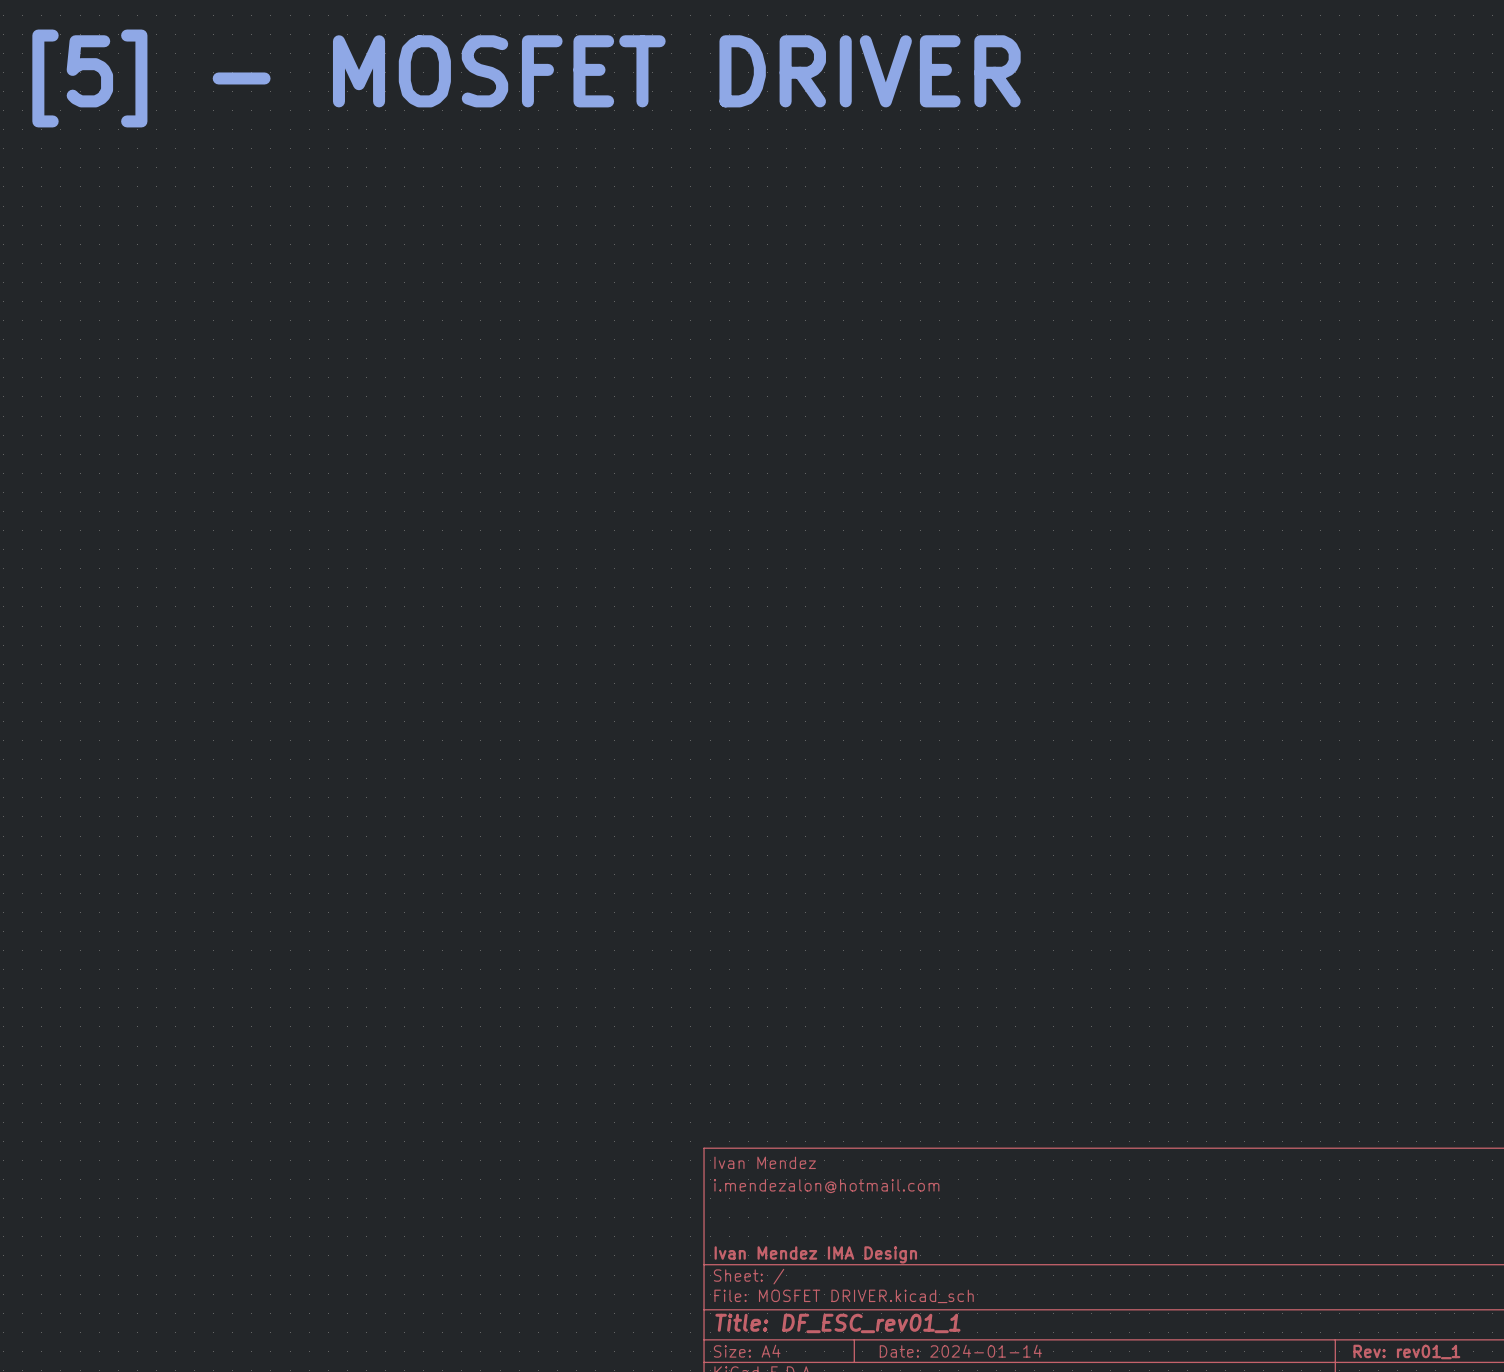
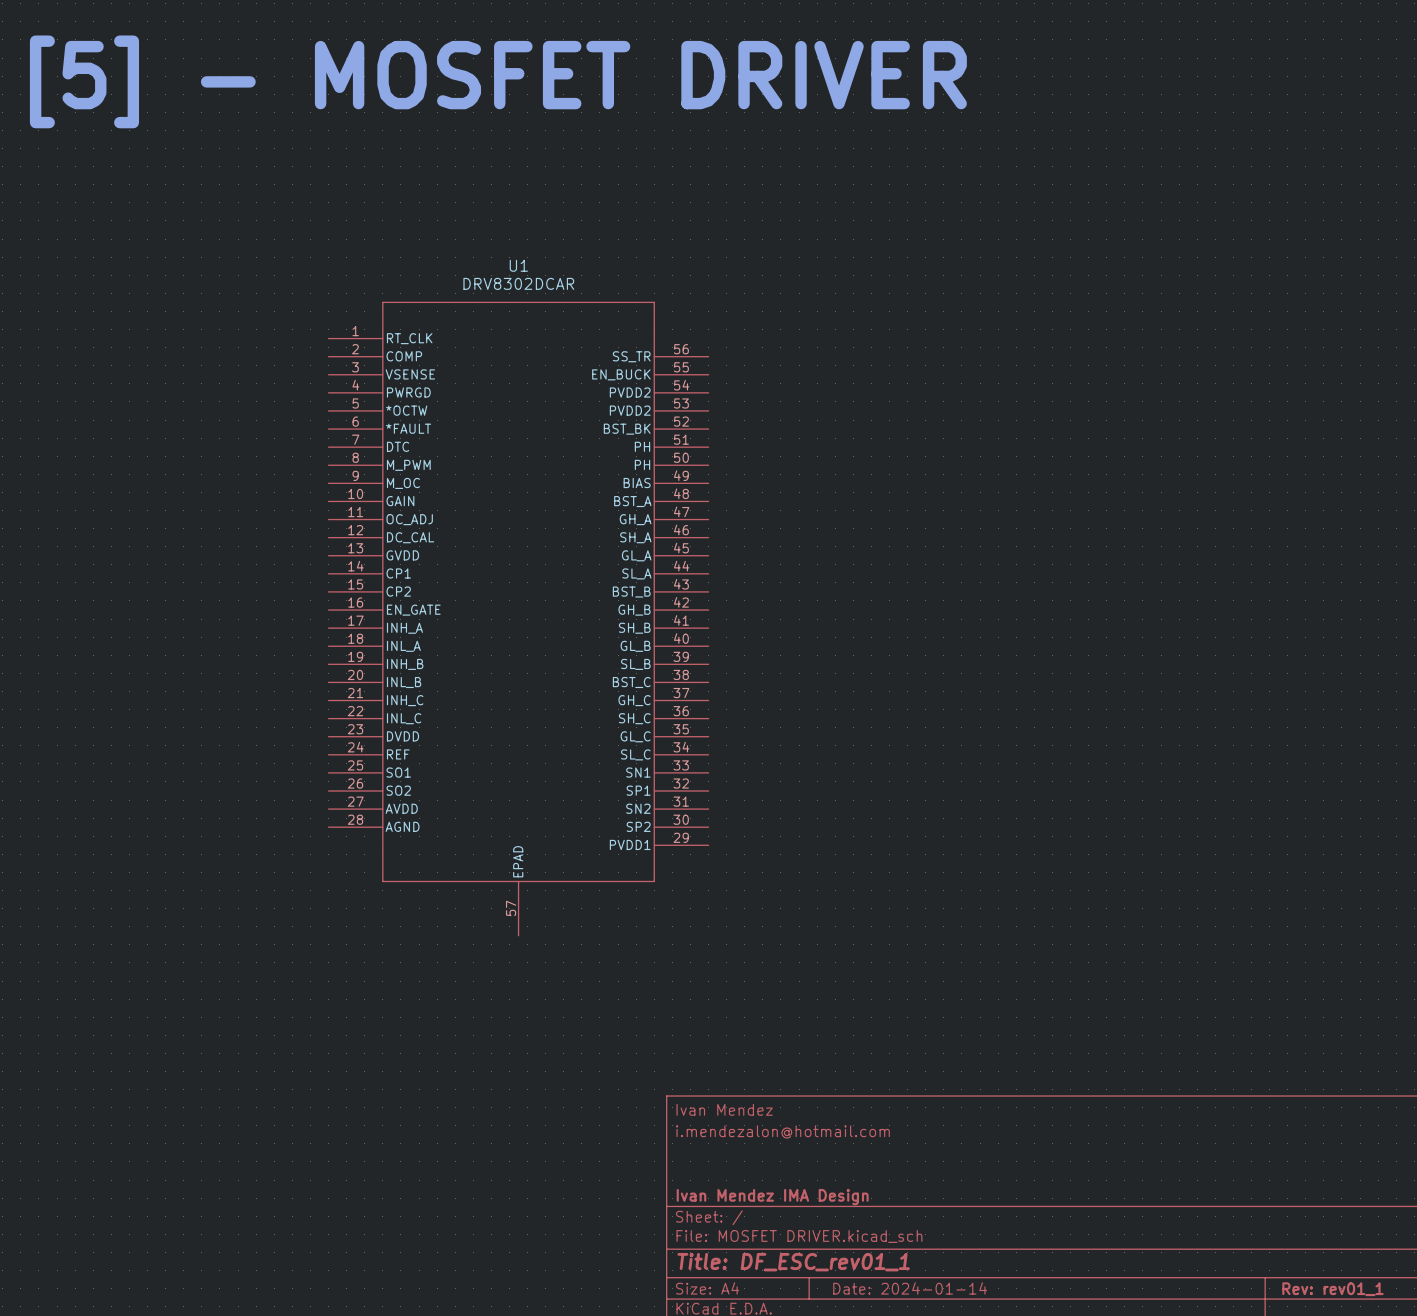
U1: none -> DRV8302DCAR (518, 618)

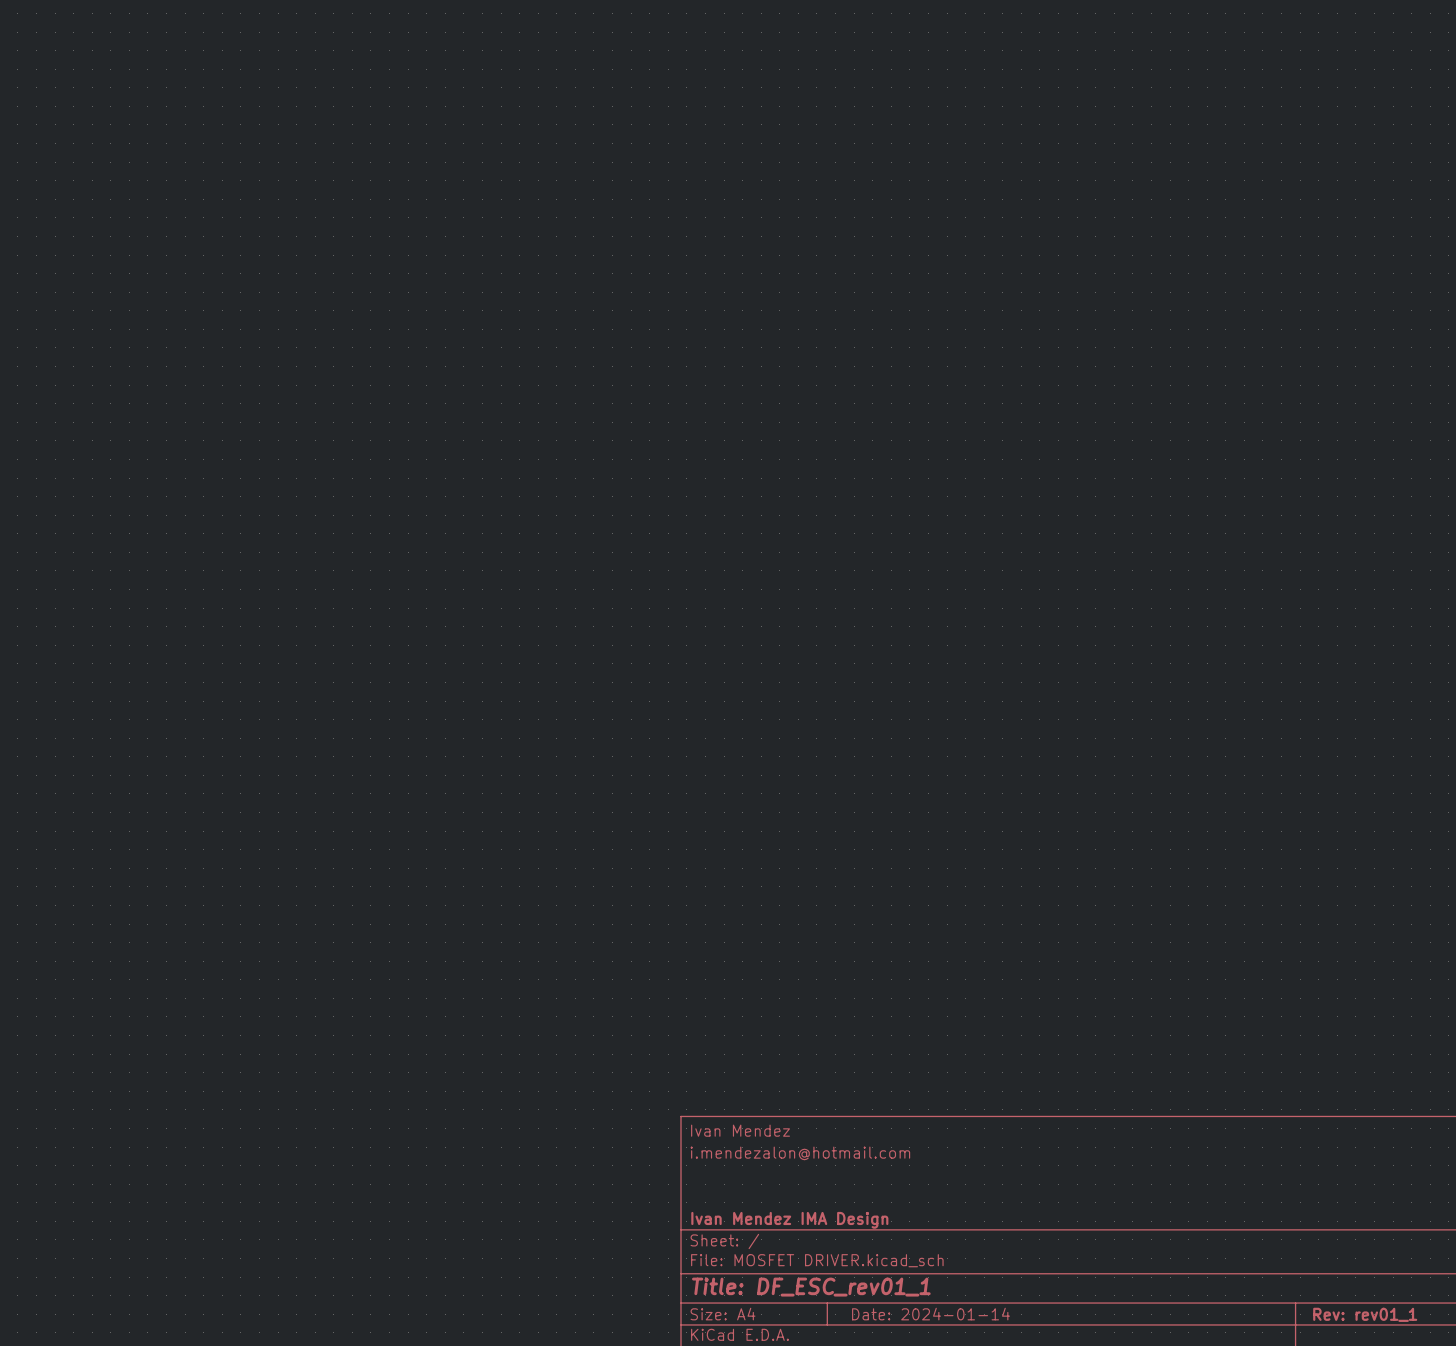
text: [5] - MOSFET DRIVER (498, 81) -> none
U1: DRV8302DCAR (518, 618) -> none

